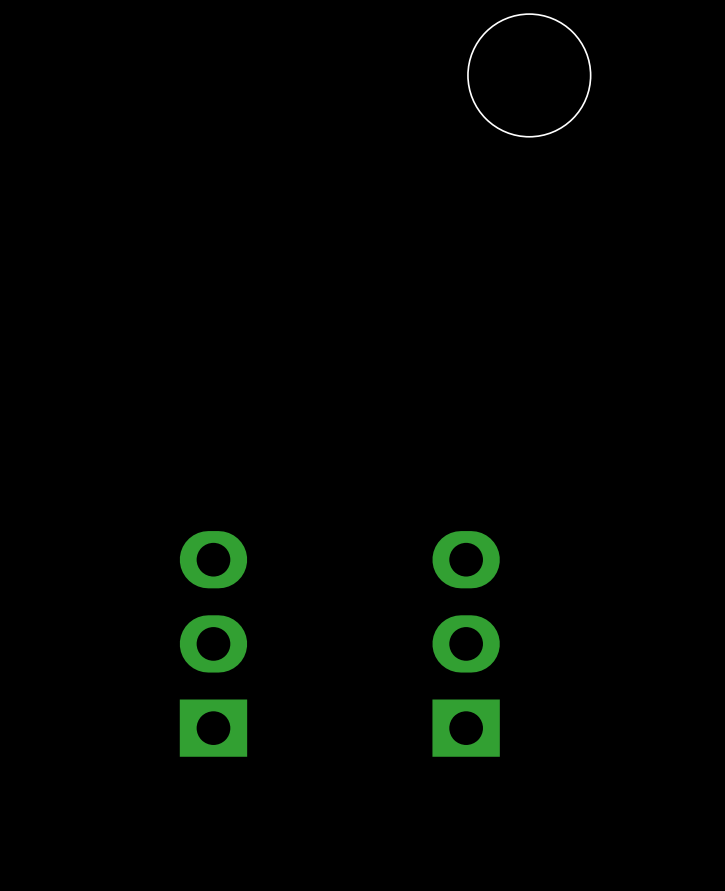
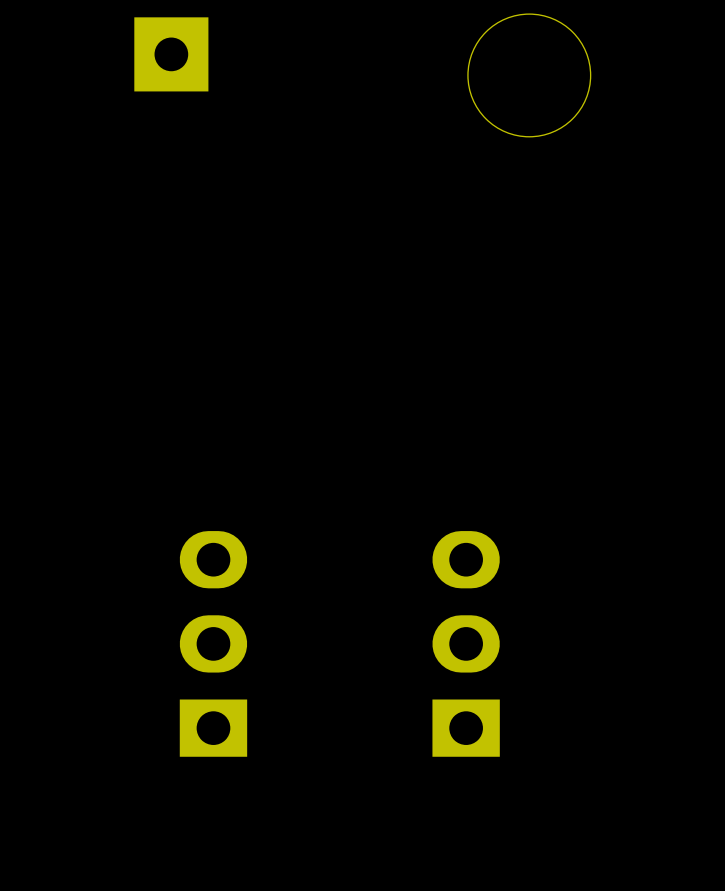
part: none -> (171, 54)

